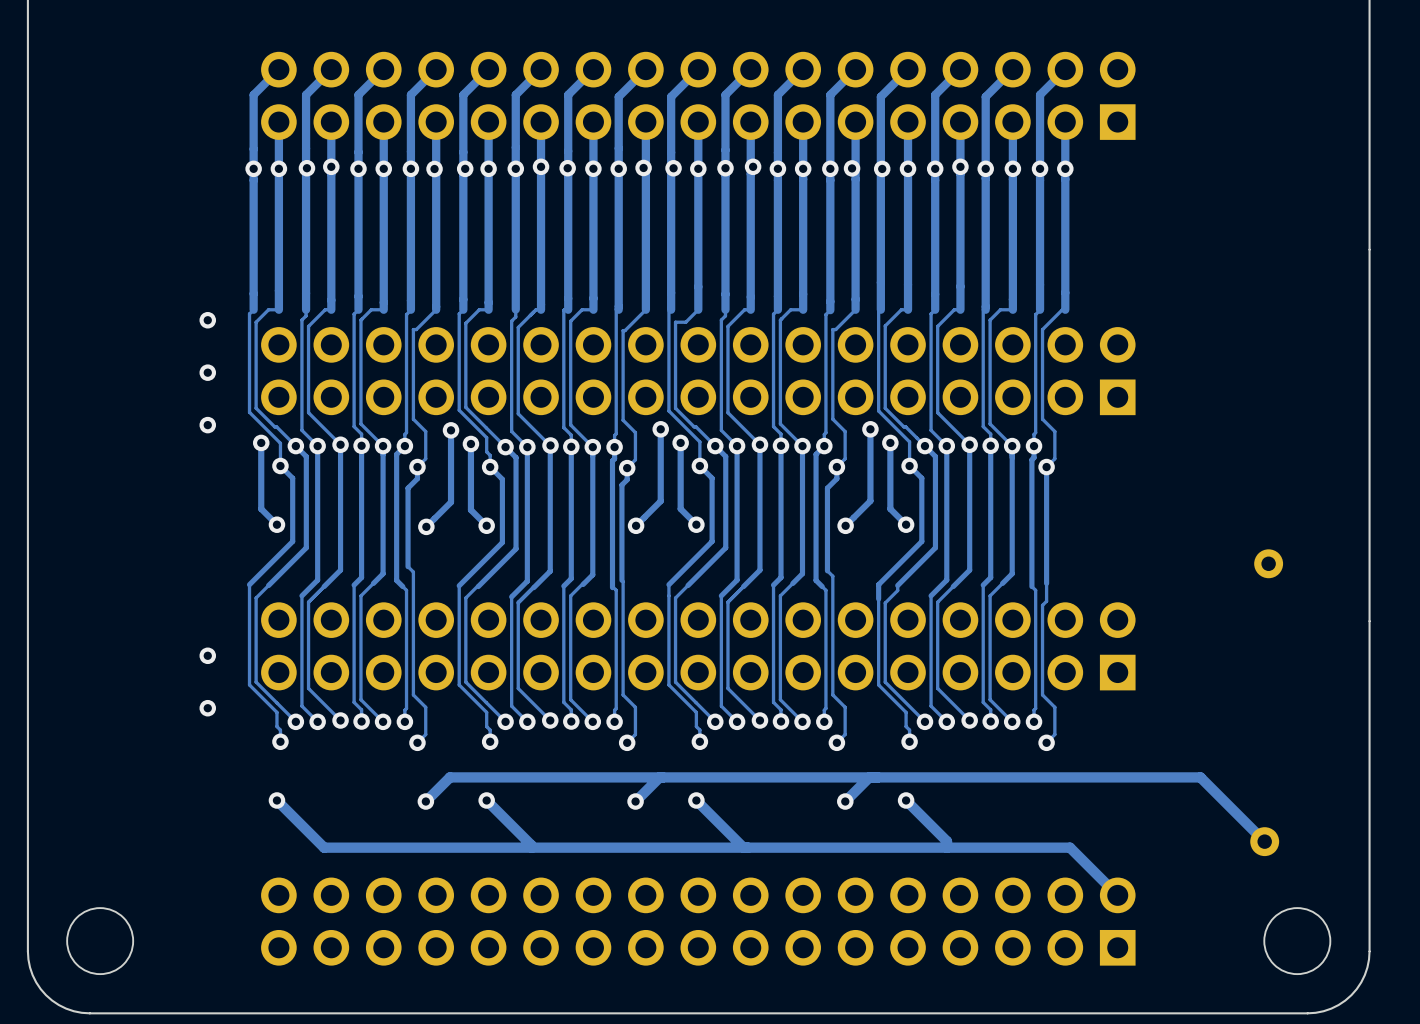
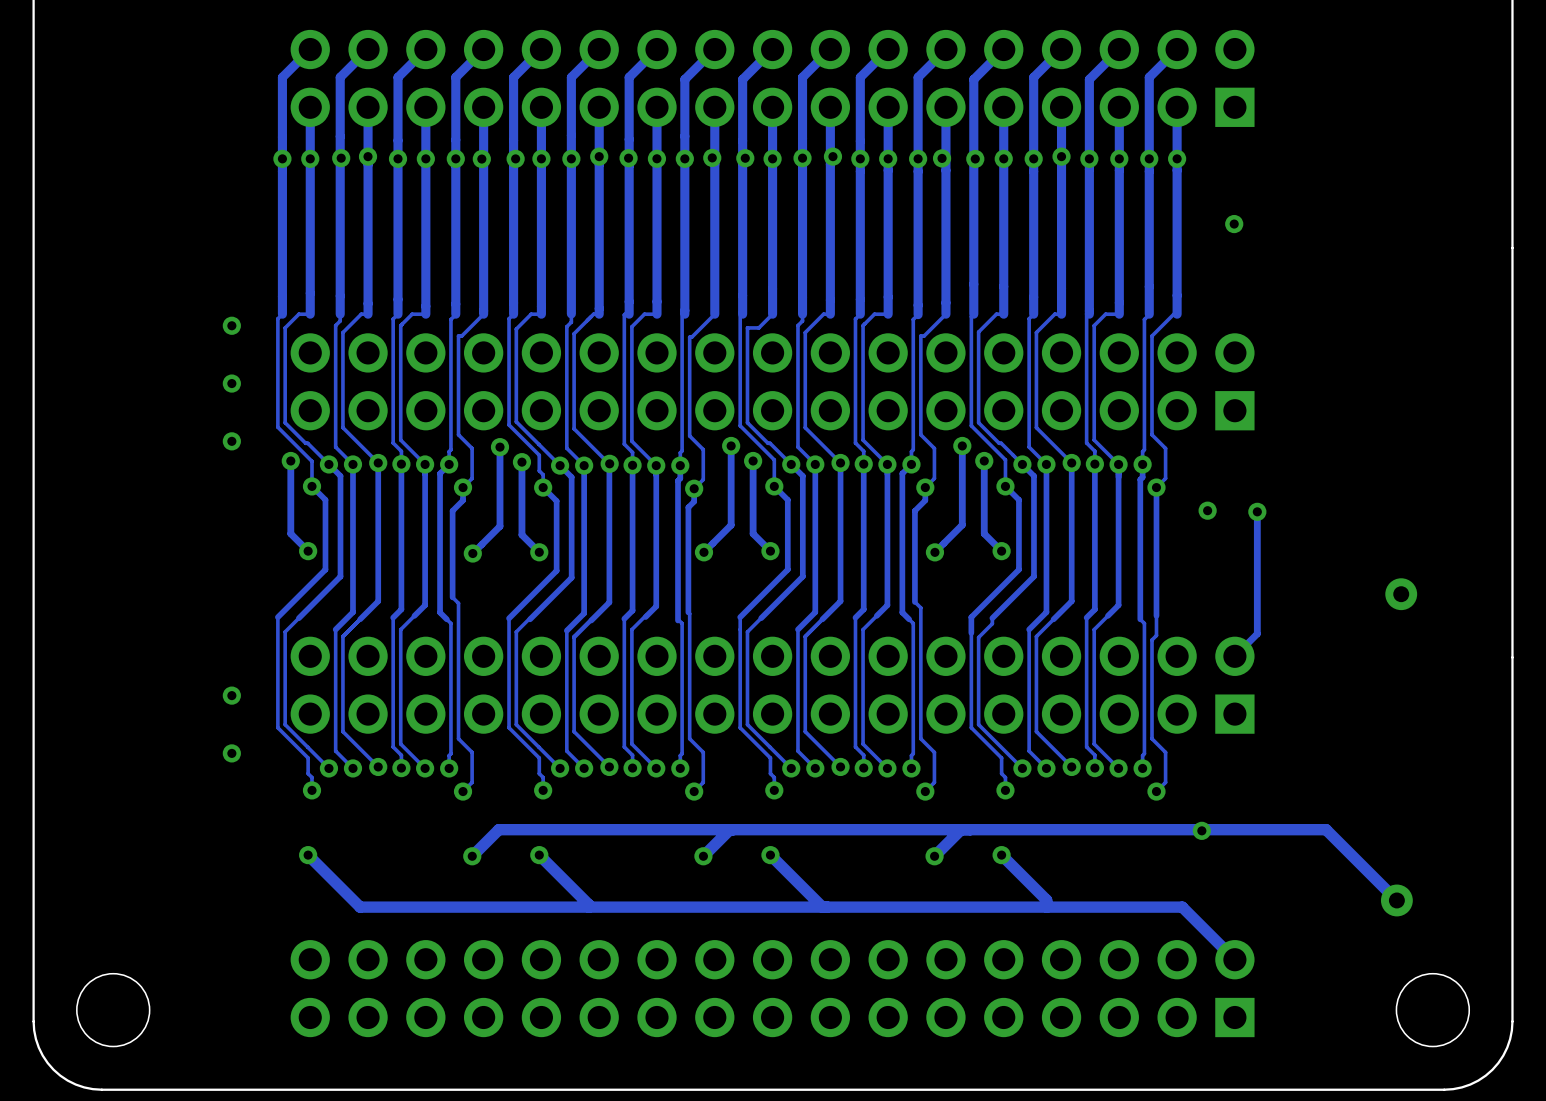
via: none -> (1234, 224)
via: none -> (1207, 510)
track: none -> (1257, 511) (1257, 633) (1234, 656)
via: none -> (1257, 511)
via: none -> (1201, 830)

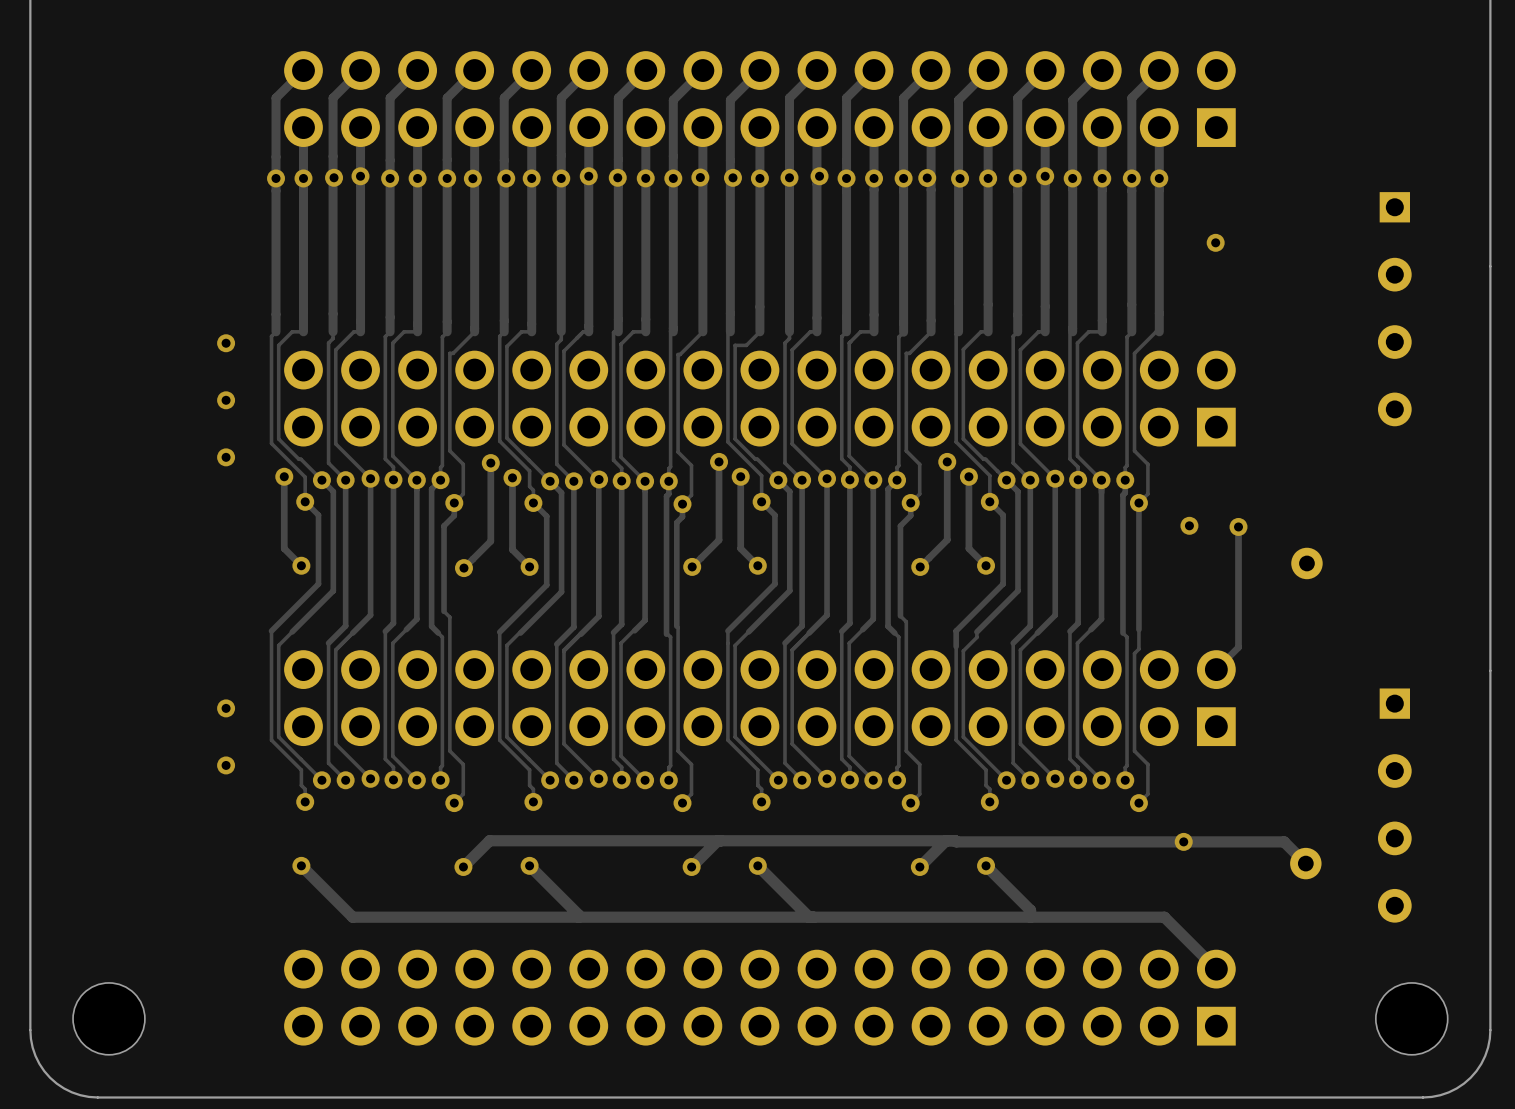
part: none -> (1394, 309)
part position: (1401, 594) -> (1306, 563)
part: none -> (1394, 805)
track: (970, 829) (1326, 829) (1396, 900) -> (955, 840) (1284, 841) (1305, 863)
part position: (1396, 900) -> (1305, 863)

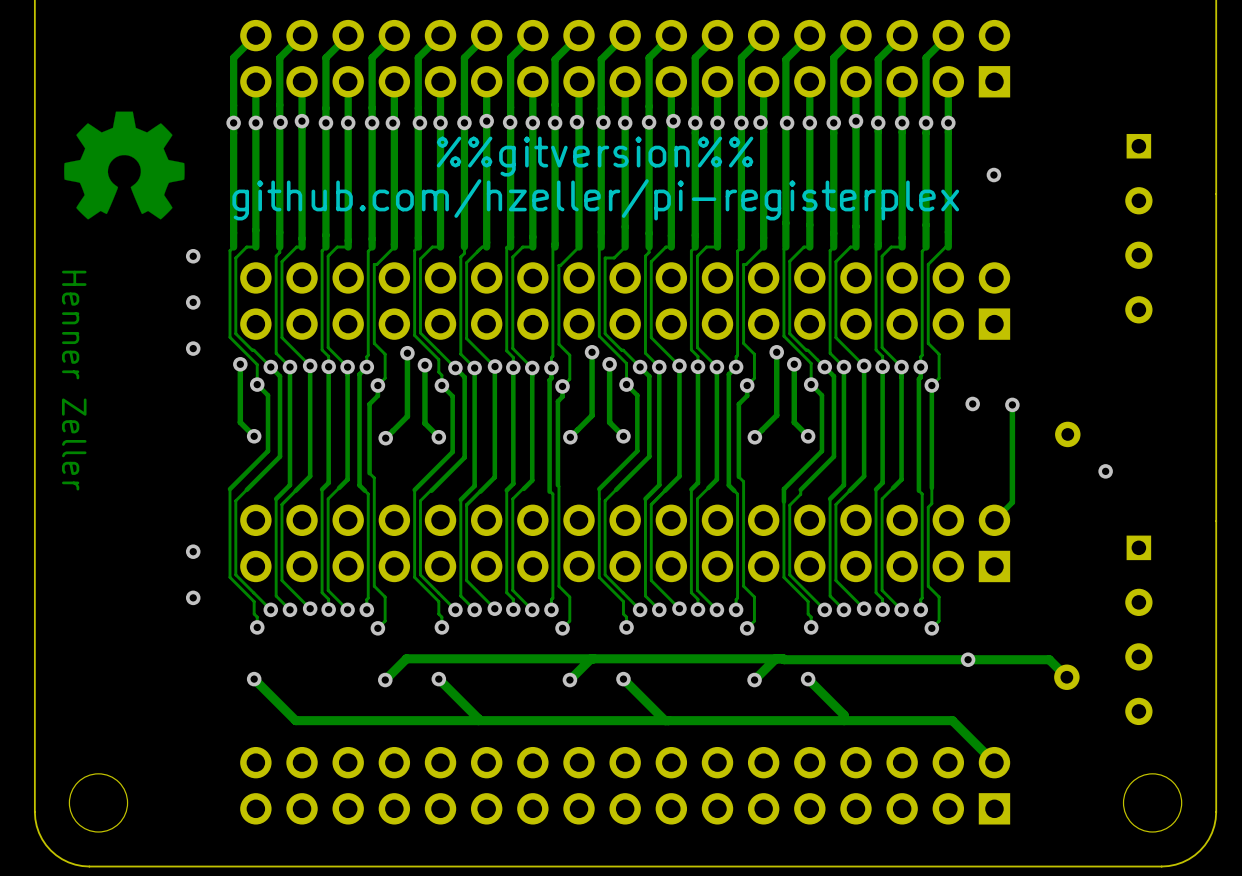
drawing: none -> [64, 111, 185, 220]
text: none -> %%gitversion%% (595, 156)
text: none -> github.com/hzeller/pi-registerplex (595, 199)
text: none -> Henner Zeller (74, 380)
via: none -> (1105, 471)

